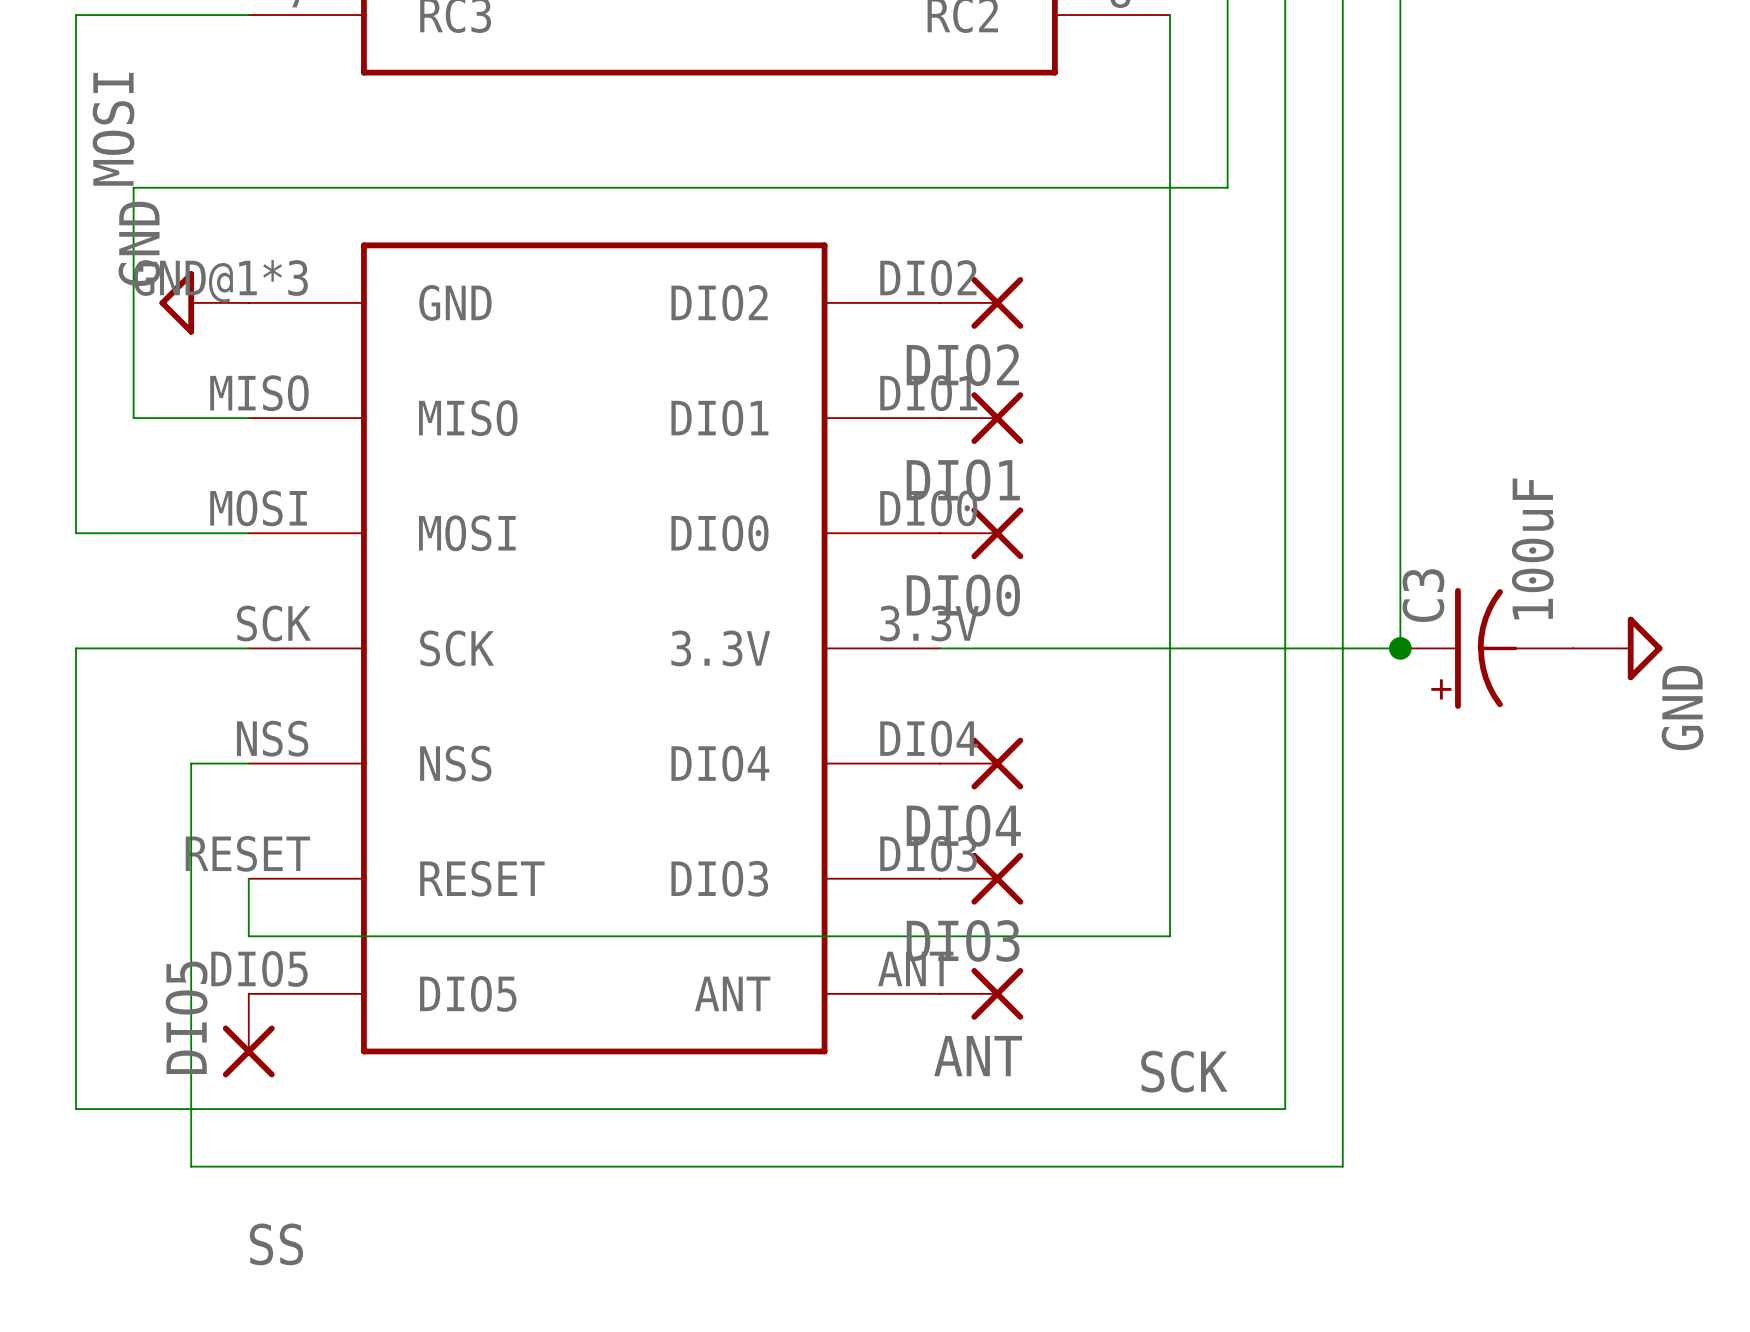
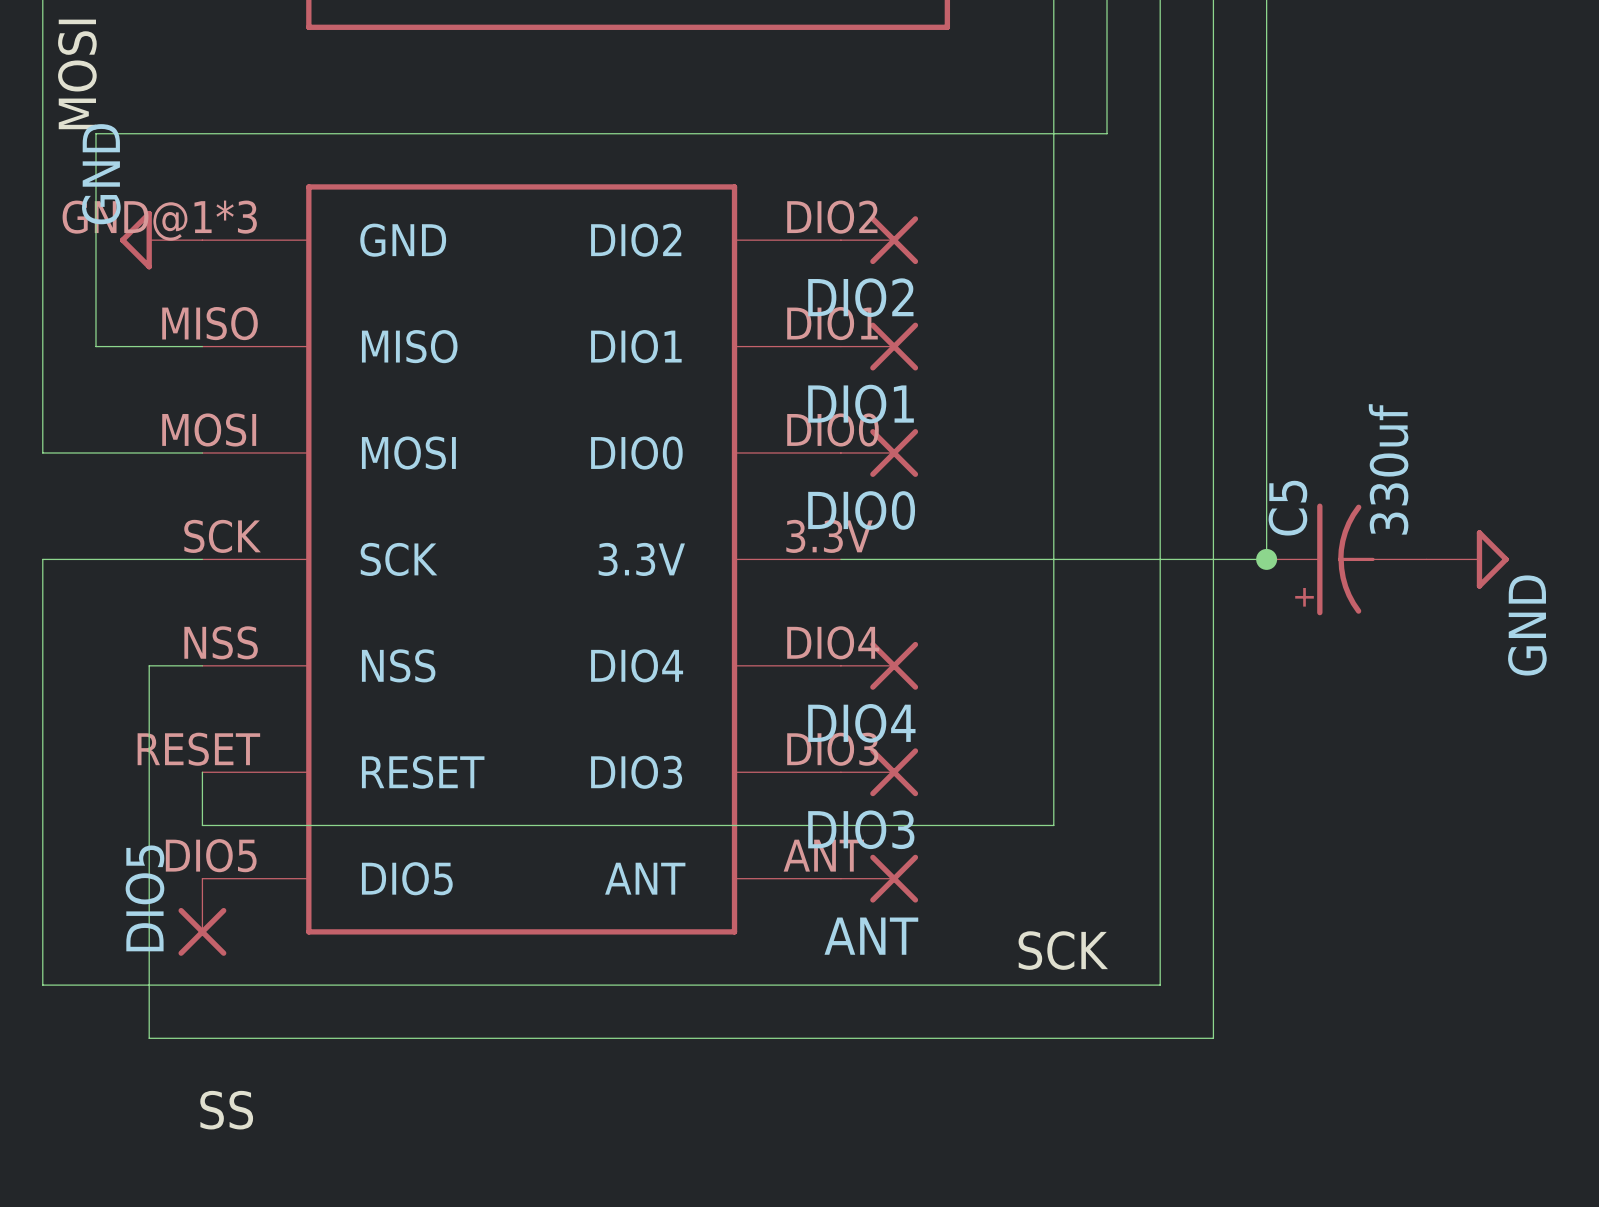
C3 value: 100uF (1532, 548) -> 330uf (1388, 469)
C3 name: C3 (1423, 595) -> C5 (1287, 508)

